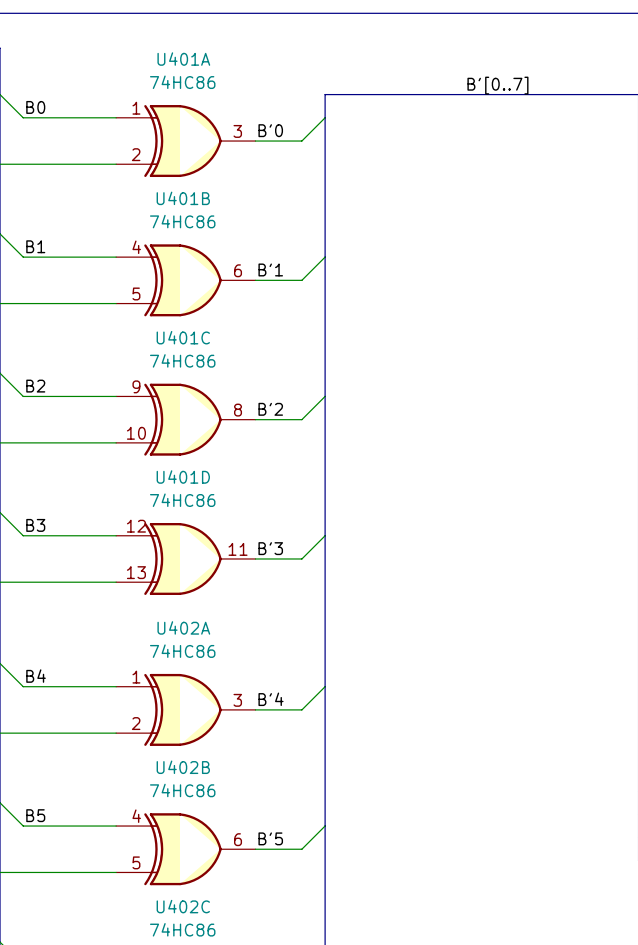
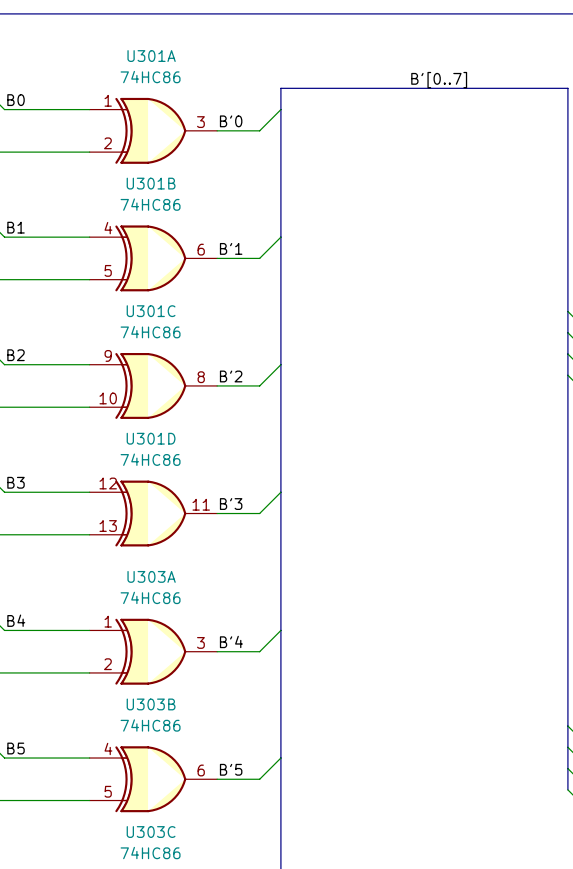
U401A name: U401A (183, 59) -> U301A (151, 56)
U401B name: U401B (183, 198) -> U301B (151, 183)
U401C name: U401C (183, 337) -> U301C (151, 311)
U401D name: U401D (183, 477) -> U301D (151, 438)
U402A name: U402A (183, 627) -> U303A (151, 576)
U402B name: U402B (183, 767) -> U303B (151, 704)
U402C name: U402C (183, 906) -> U303C (151, 832)

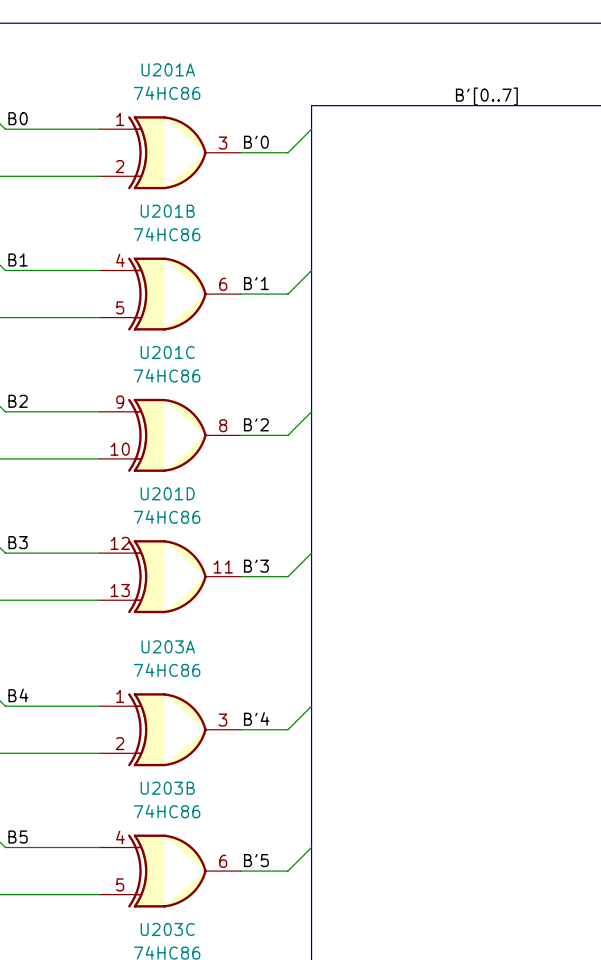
U301A name: U301A (151, 56) -> U201A (168, 69)
U301B name: U301B (151, 183) -> U201B (167, 211)
U301C name: U301C (151, 311) -> U201C (167, 352)
U301D name: U301D (151, 438) -> U201D (167, 493)
U303A name: U303A (151, 576) -> U203A (168, 646)
U303B name: U303B (151, 704) -> U203B (167, 788)
U303C name: U303C (151, 832) -> U203C (167, 929)

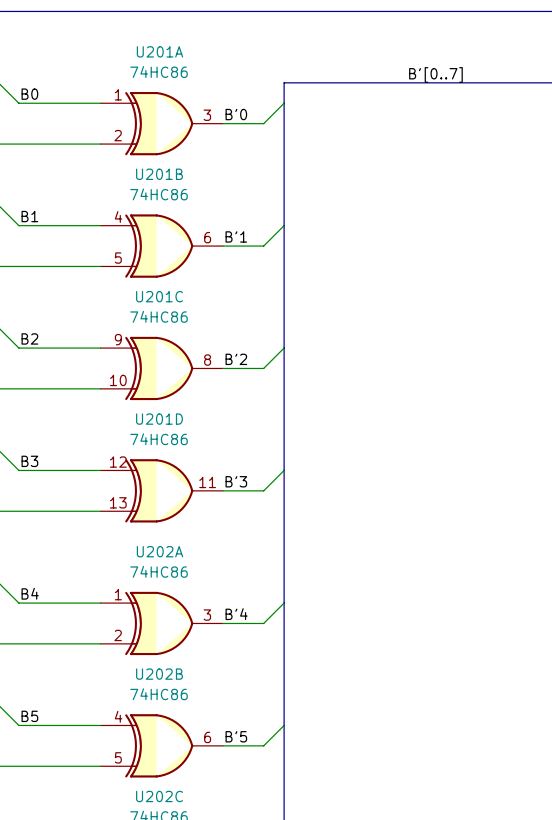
U203A name: U203A (168, 646) -> U202A (159, 551)
U203B name: U203B (167, 788) -> U202B (159, 674)
U203C name: U203C (167, 929) -> U202C (159, 796)

